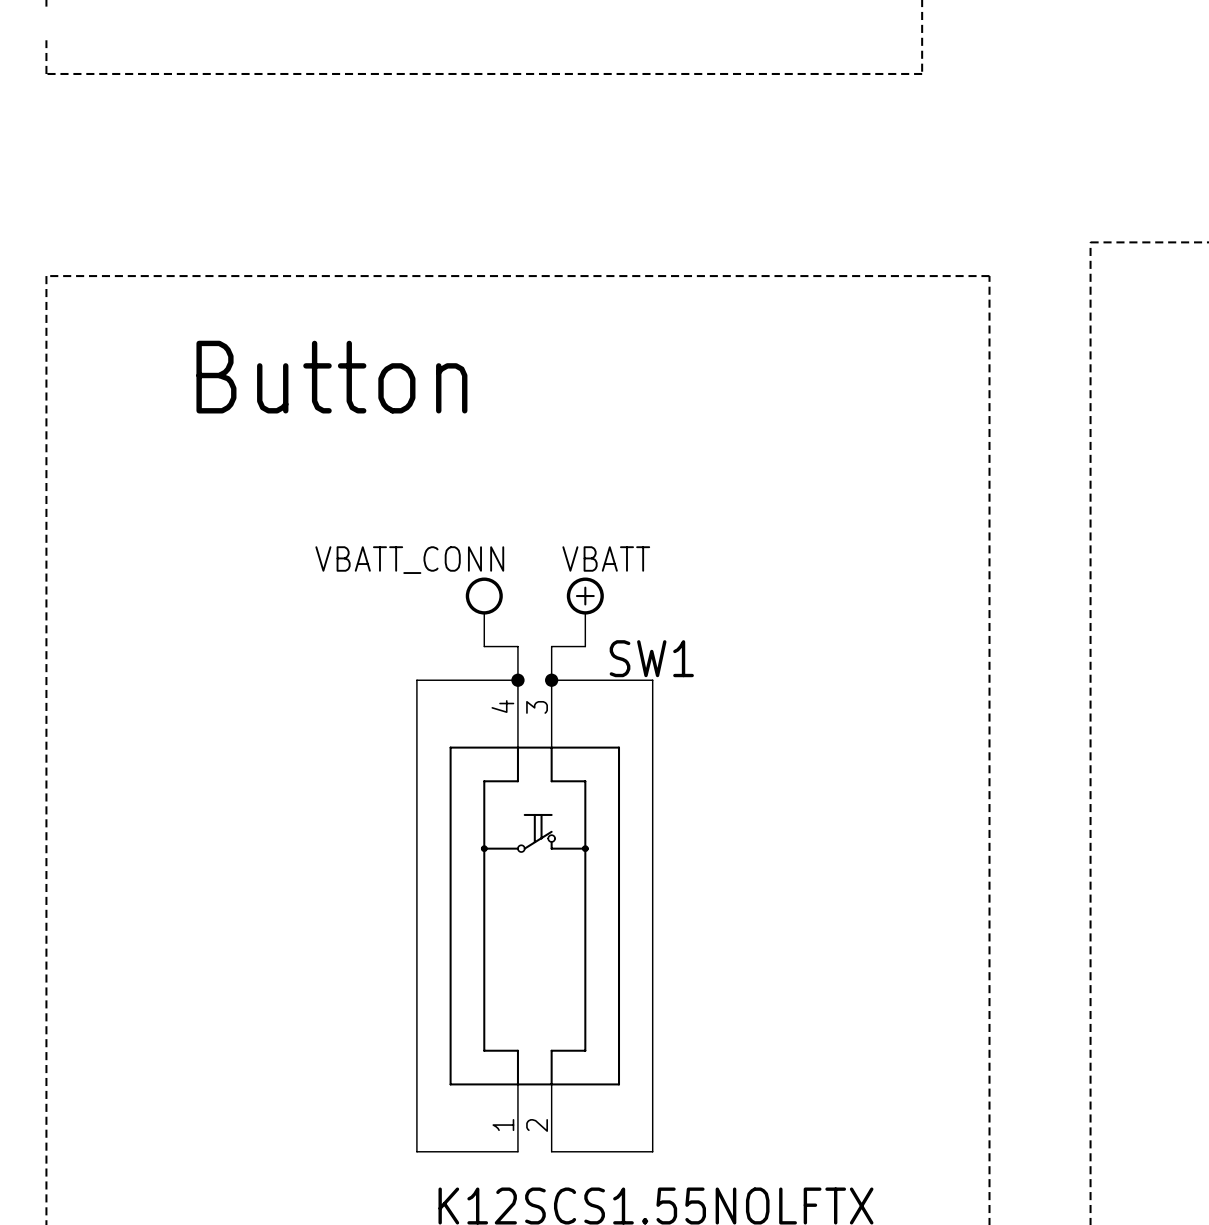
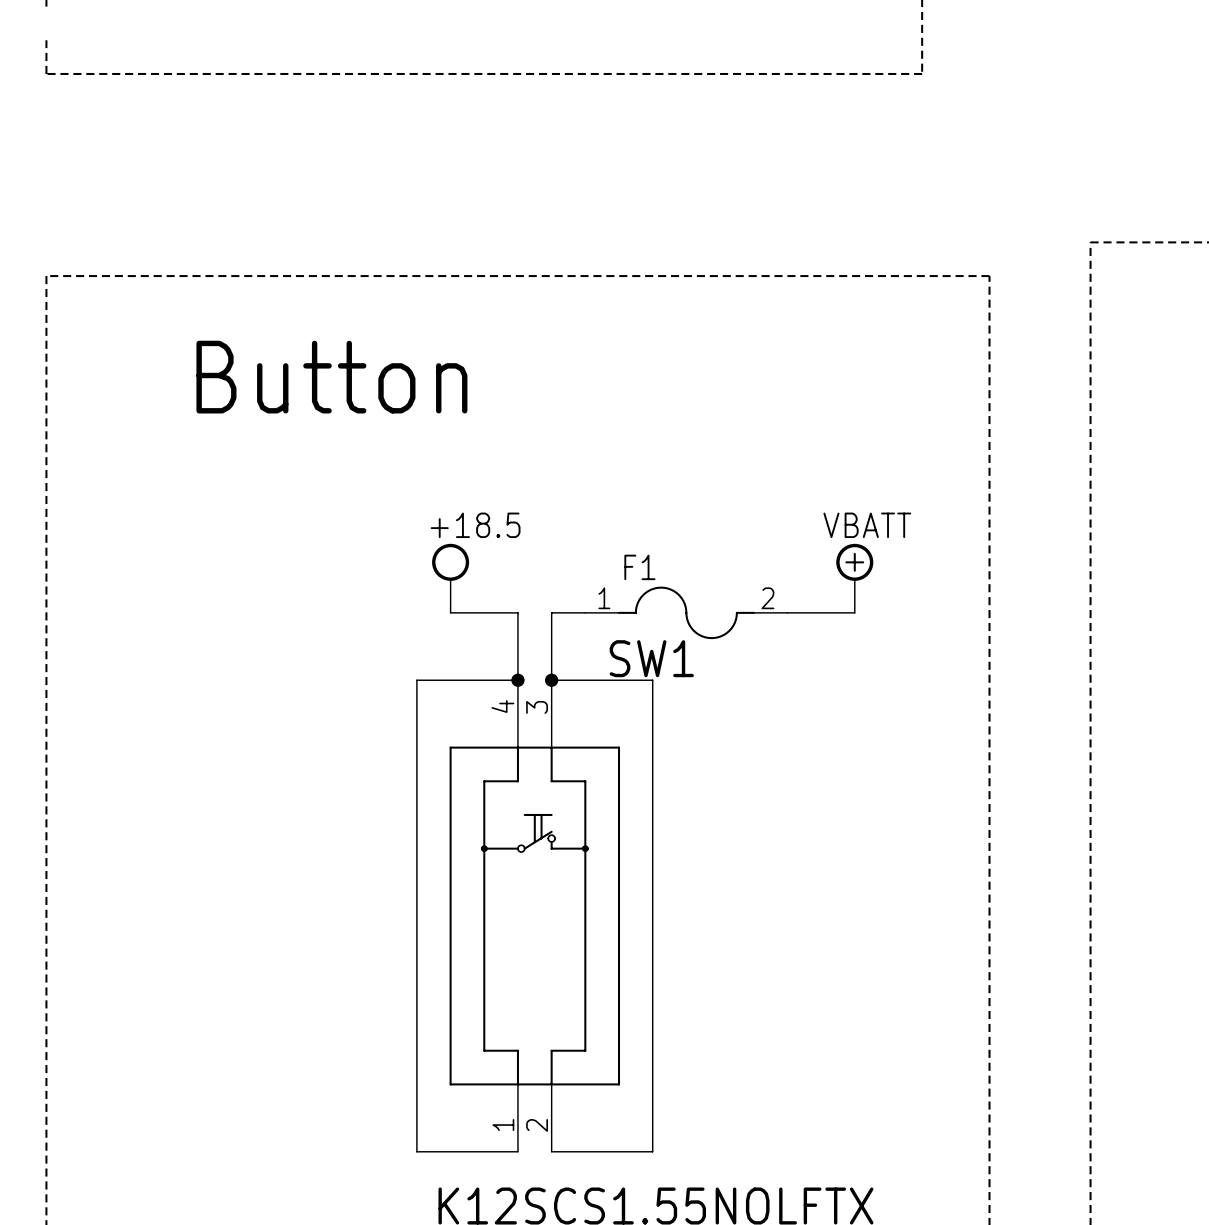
power symbol text position: VBATT (606, 558) -> VBATT (867, 525)
power symbol: none -> +18.5 (450, 578)
power symbol: VBATT_CONN (484, 612) -> none
power symbol position: VBATT (585, 612) -> VBATT (854, 578)
F1: none -> (686, 612)
wire: none -> (787, 612) (854, 612)
wire: (484, 646) (517, 646) -> (450, 612) (517, 612) (517, 646)
wire: (551, 646) (585, 646) -> (551, 646) (551, 612) (585, 612)

